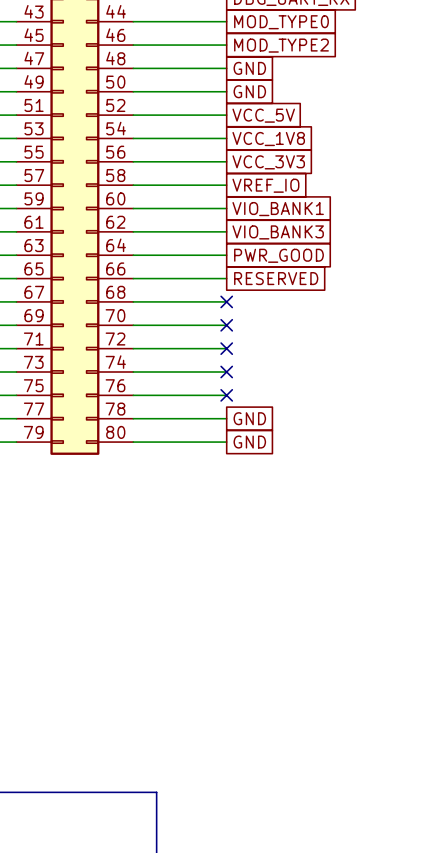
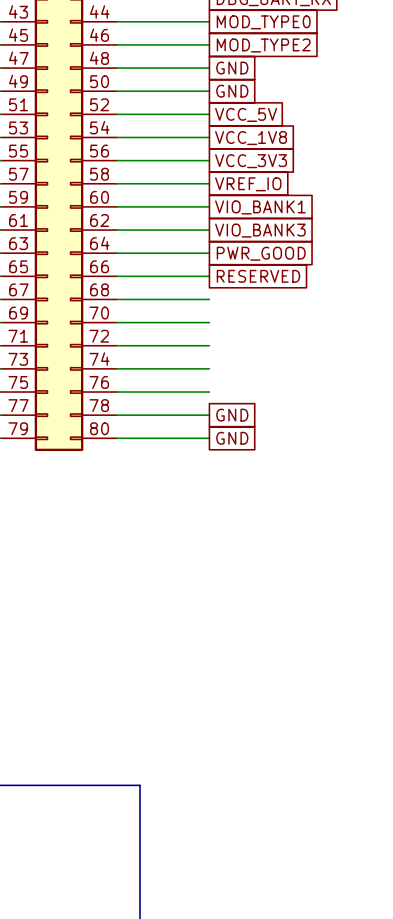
no-connect mark: (226, 301) -> none
no-connect mark: (226, 325) -> none
no-connect mark: (226, 348) -> none
no-connect mark: (226, 371) -> none
no-connect mark: (226, 395) -> none

